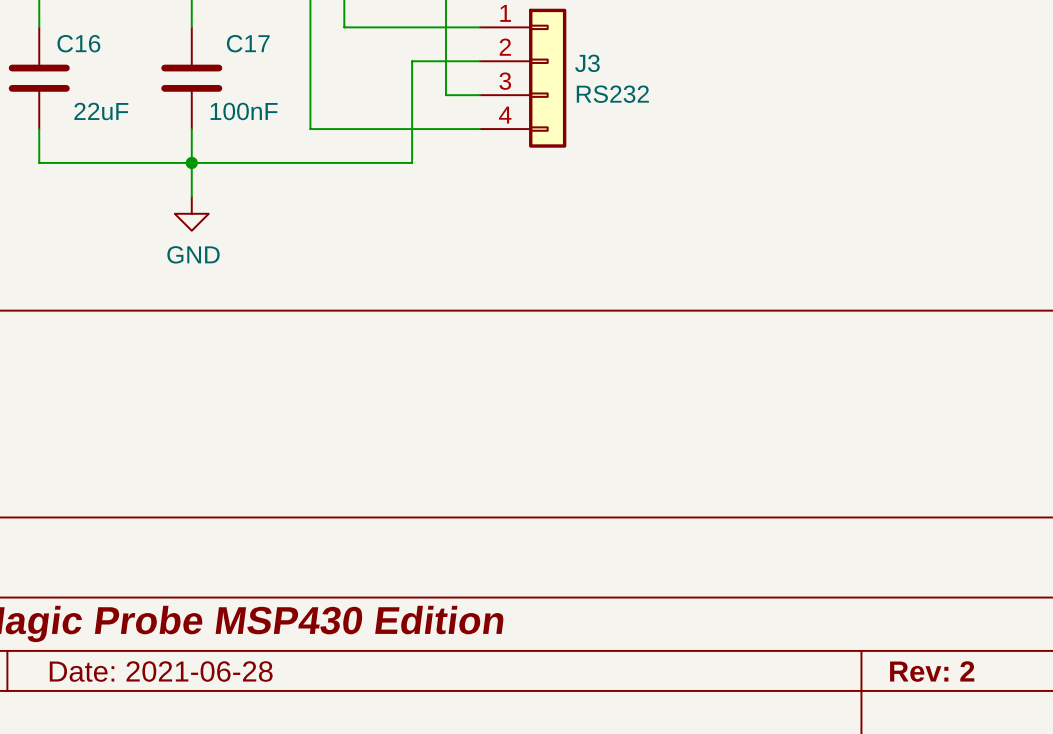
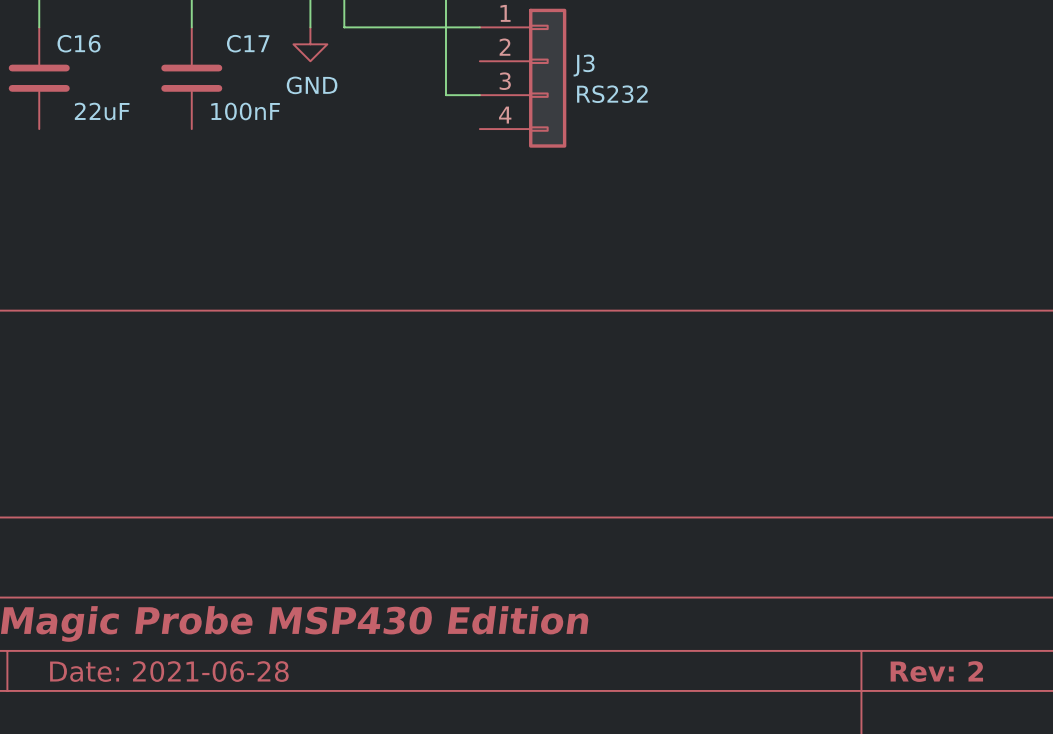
wire: (310, 27) (310, 129) (479, 129) -> none
wire: (479, 61) (412, 61) (412, 162) (39, 162) (39, 129) -> none
wire: (191, 129) (191, 196) -> none
junction: (191, 162) -> none
power symbol position: GND (191, 213) -> GND (310, 44)

